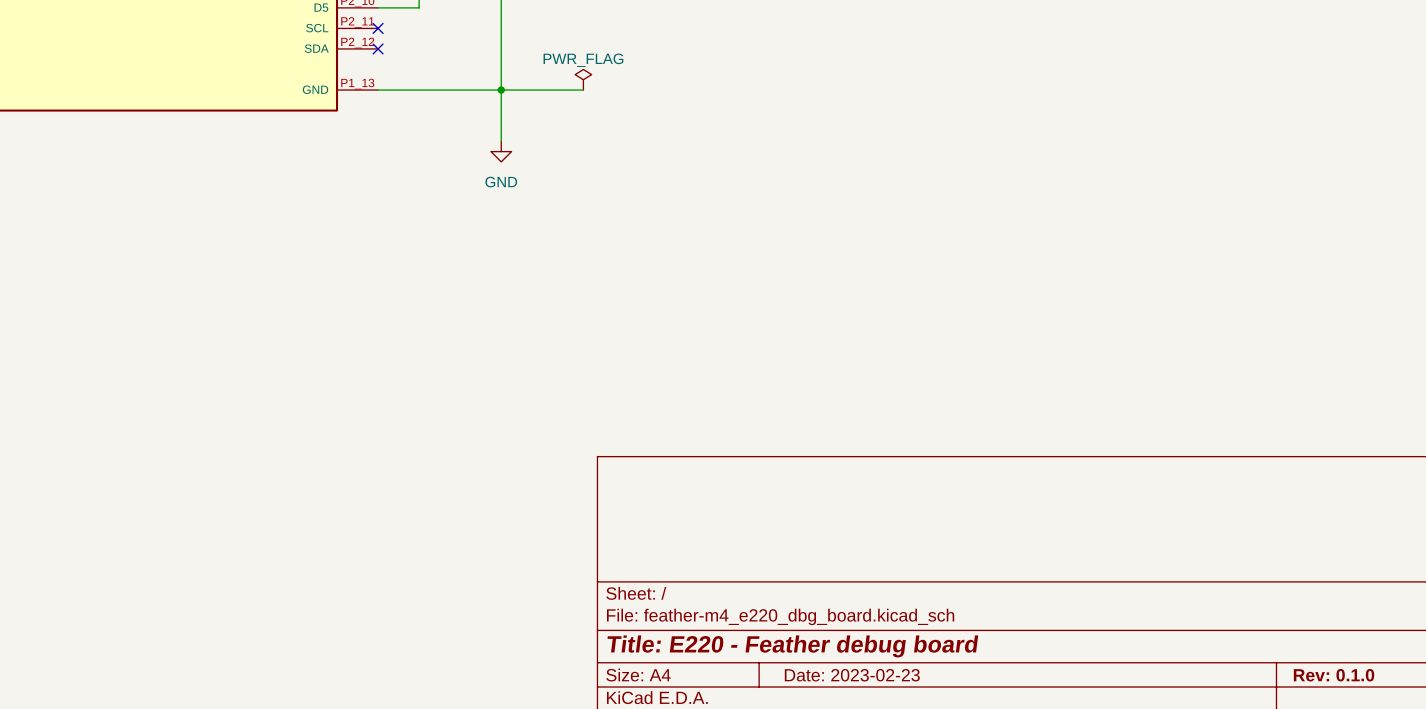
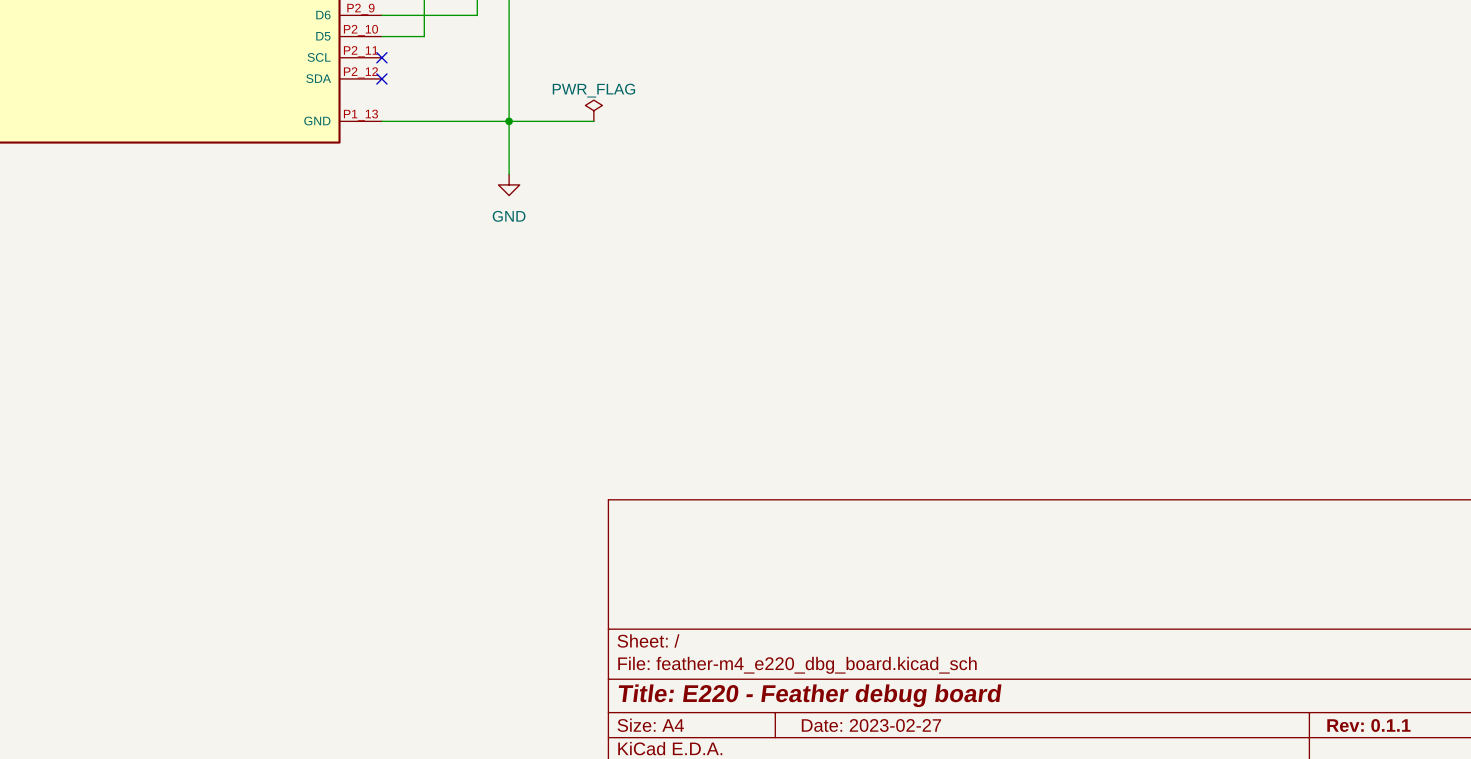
title block: Date: 2023-02-23 (852, 675) -> Date: 2023-02-27 (871, 725)
title block: Rev: 0.1.0 (1334, 675) -> Rev: 0.1.1 (1368, 725)

